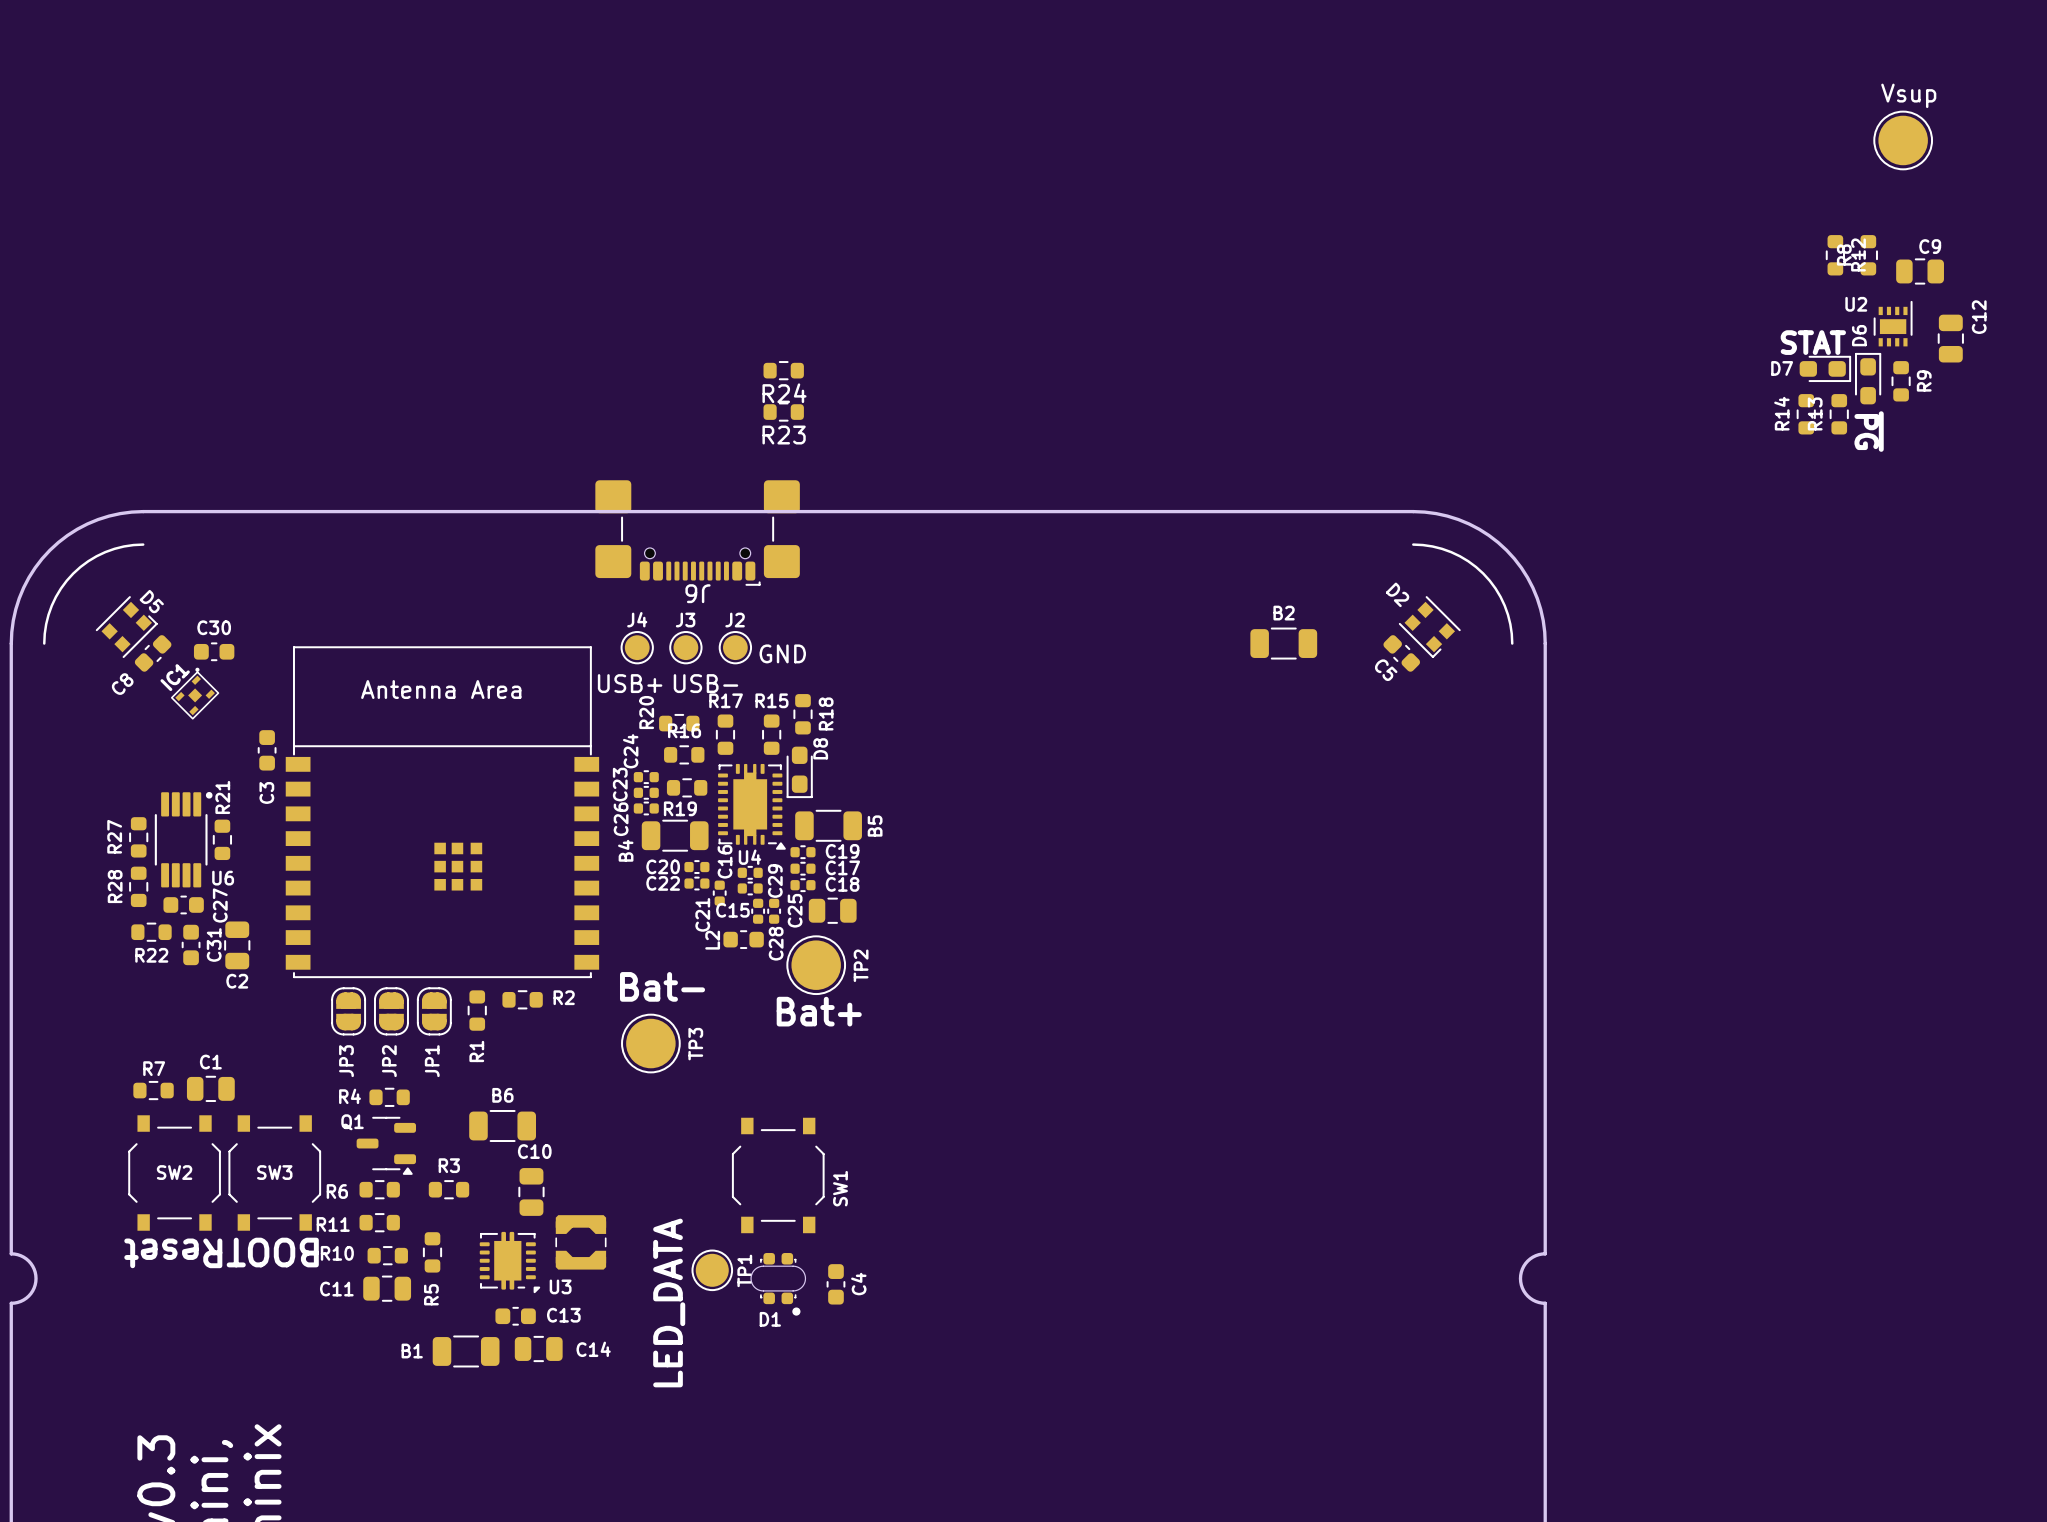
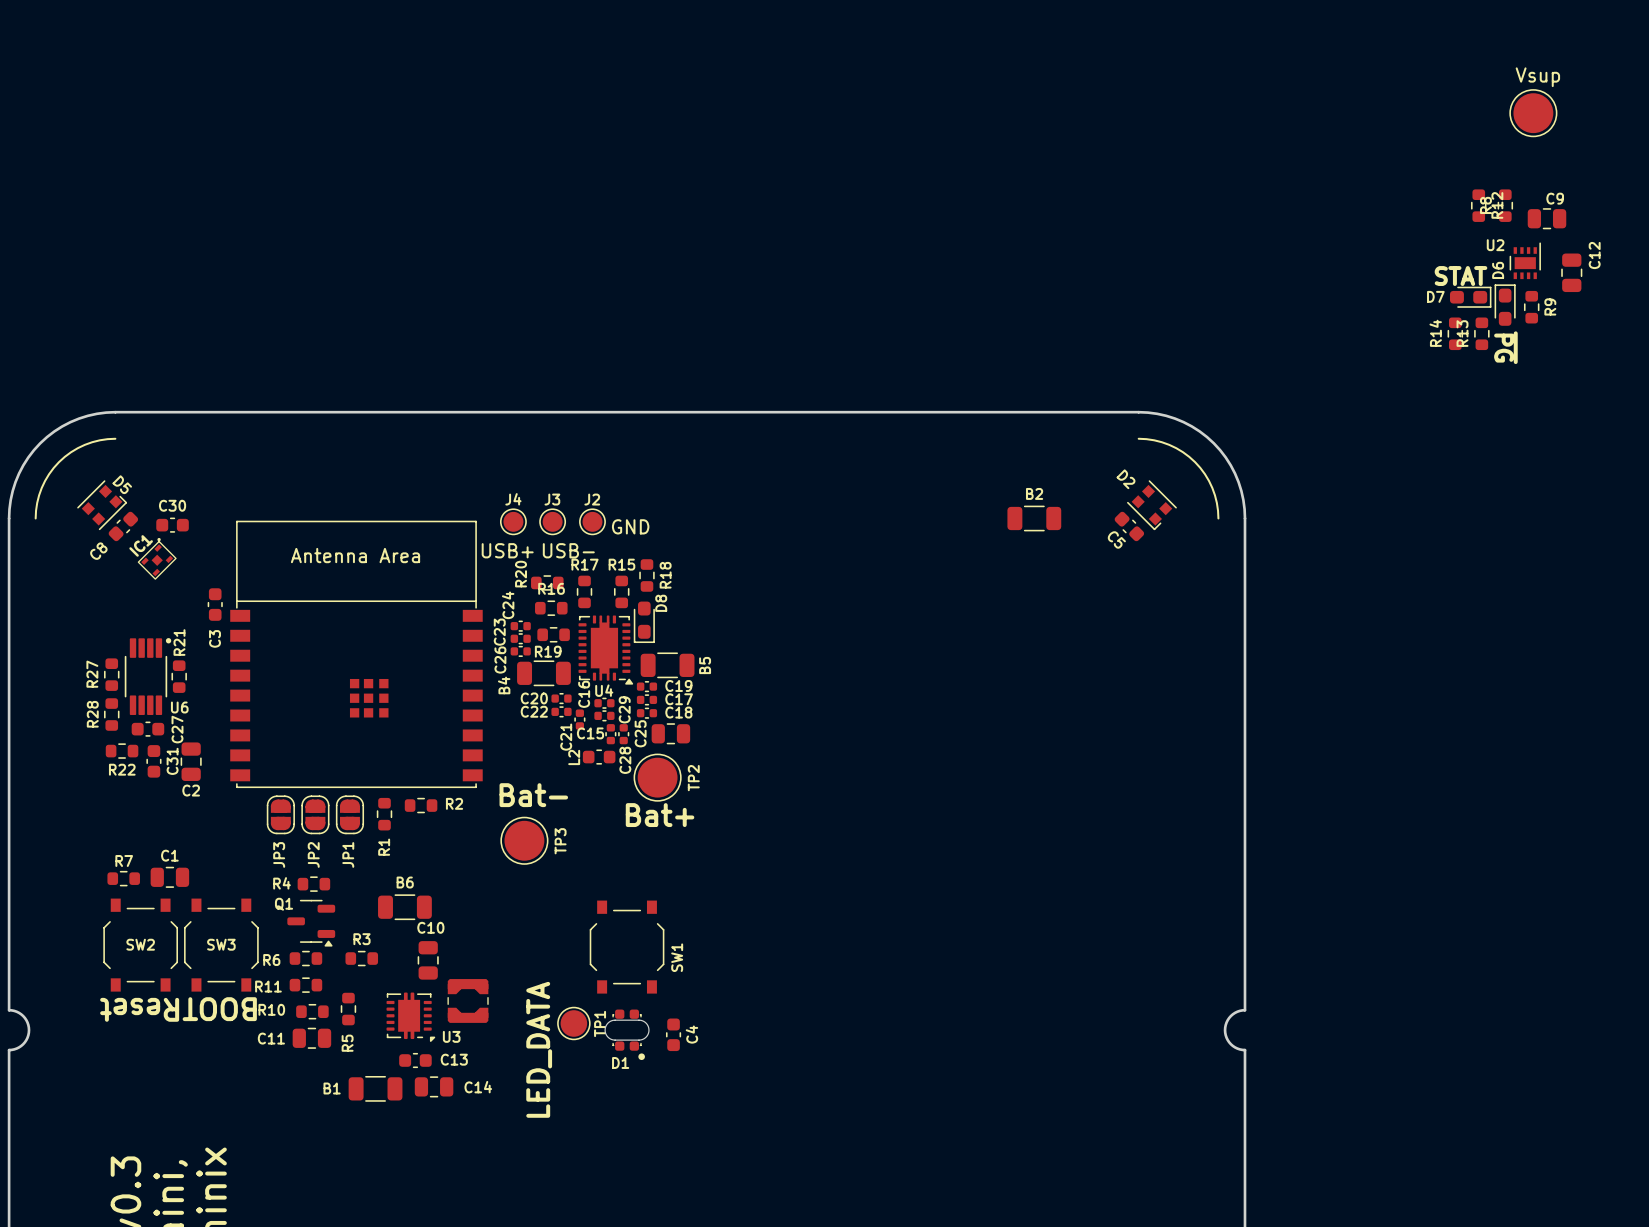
R24: (783, 370) -> none
R23: (783, 412) -> none
J6: (697, 533) -> none

